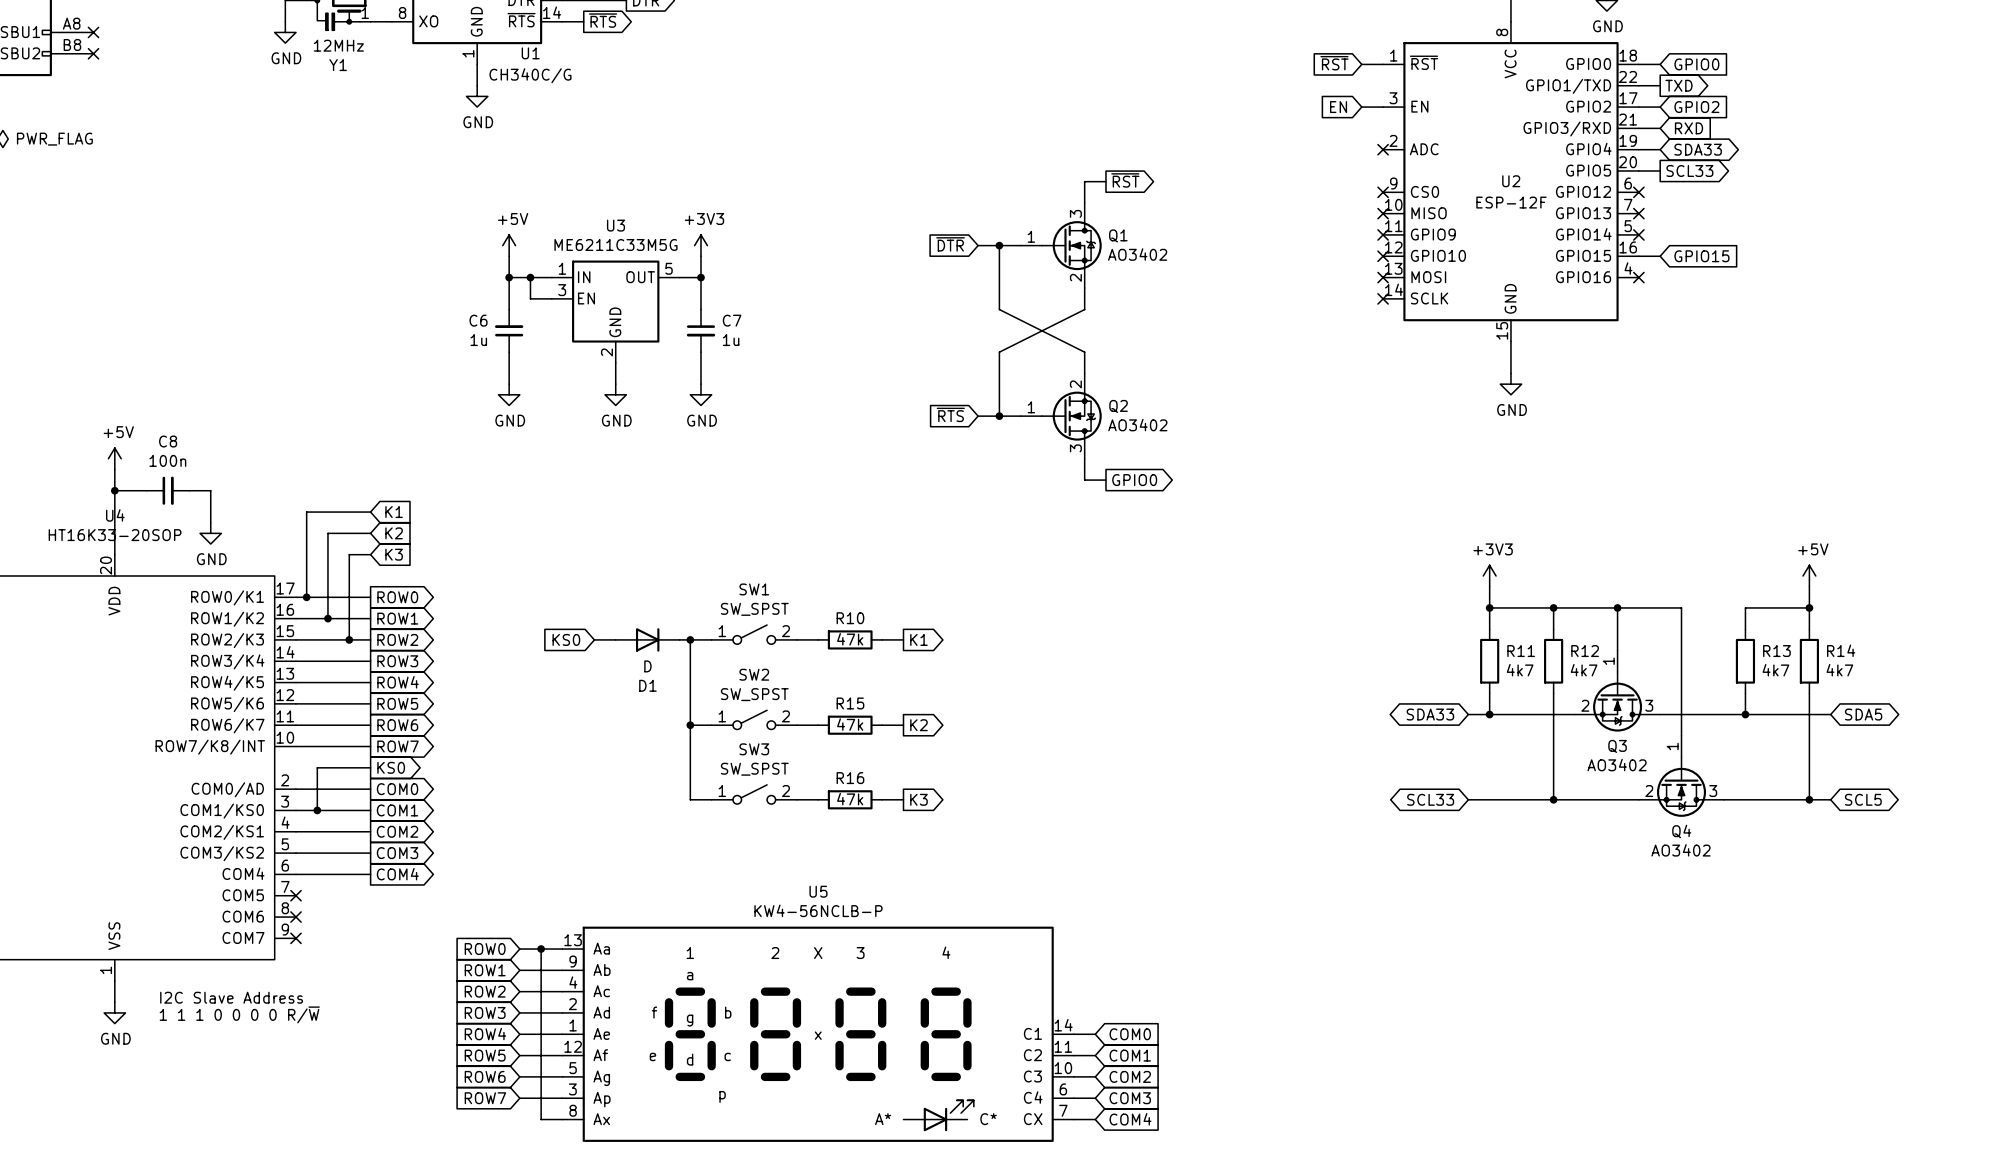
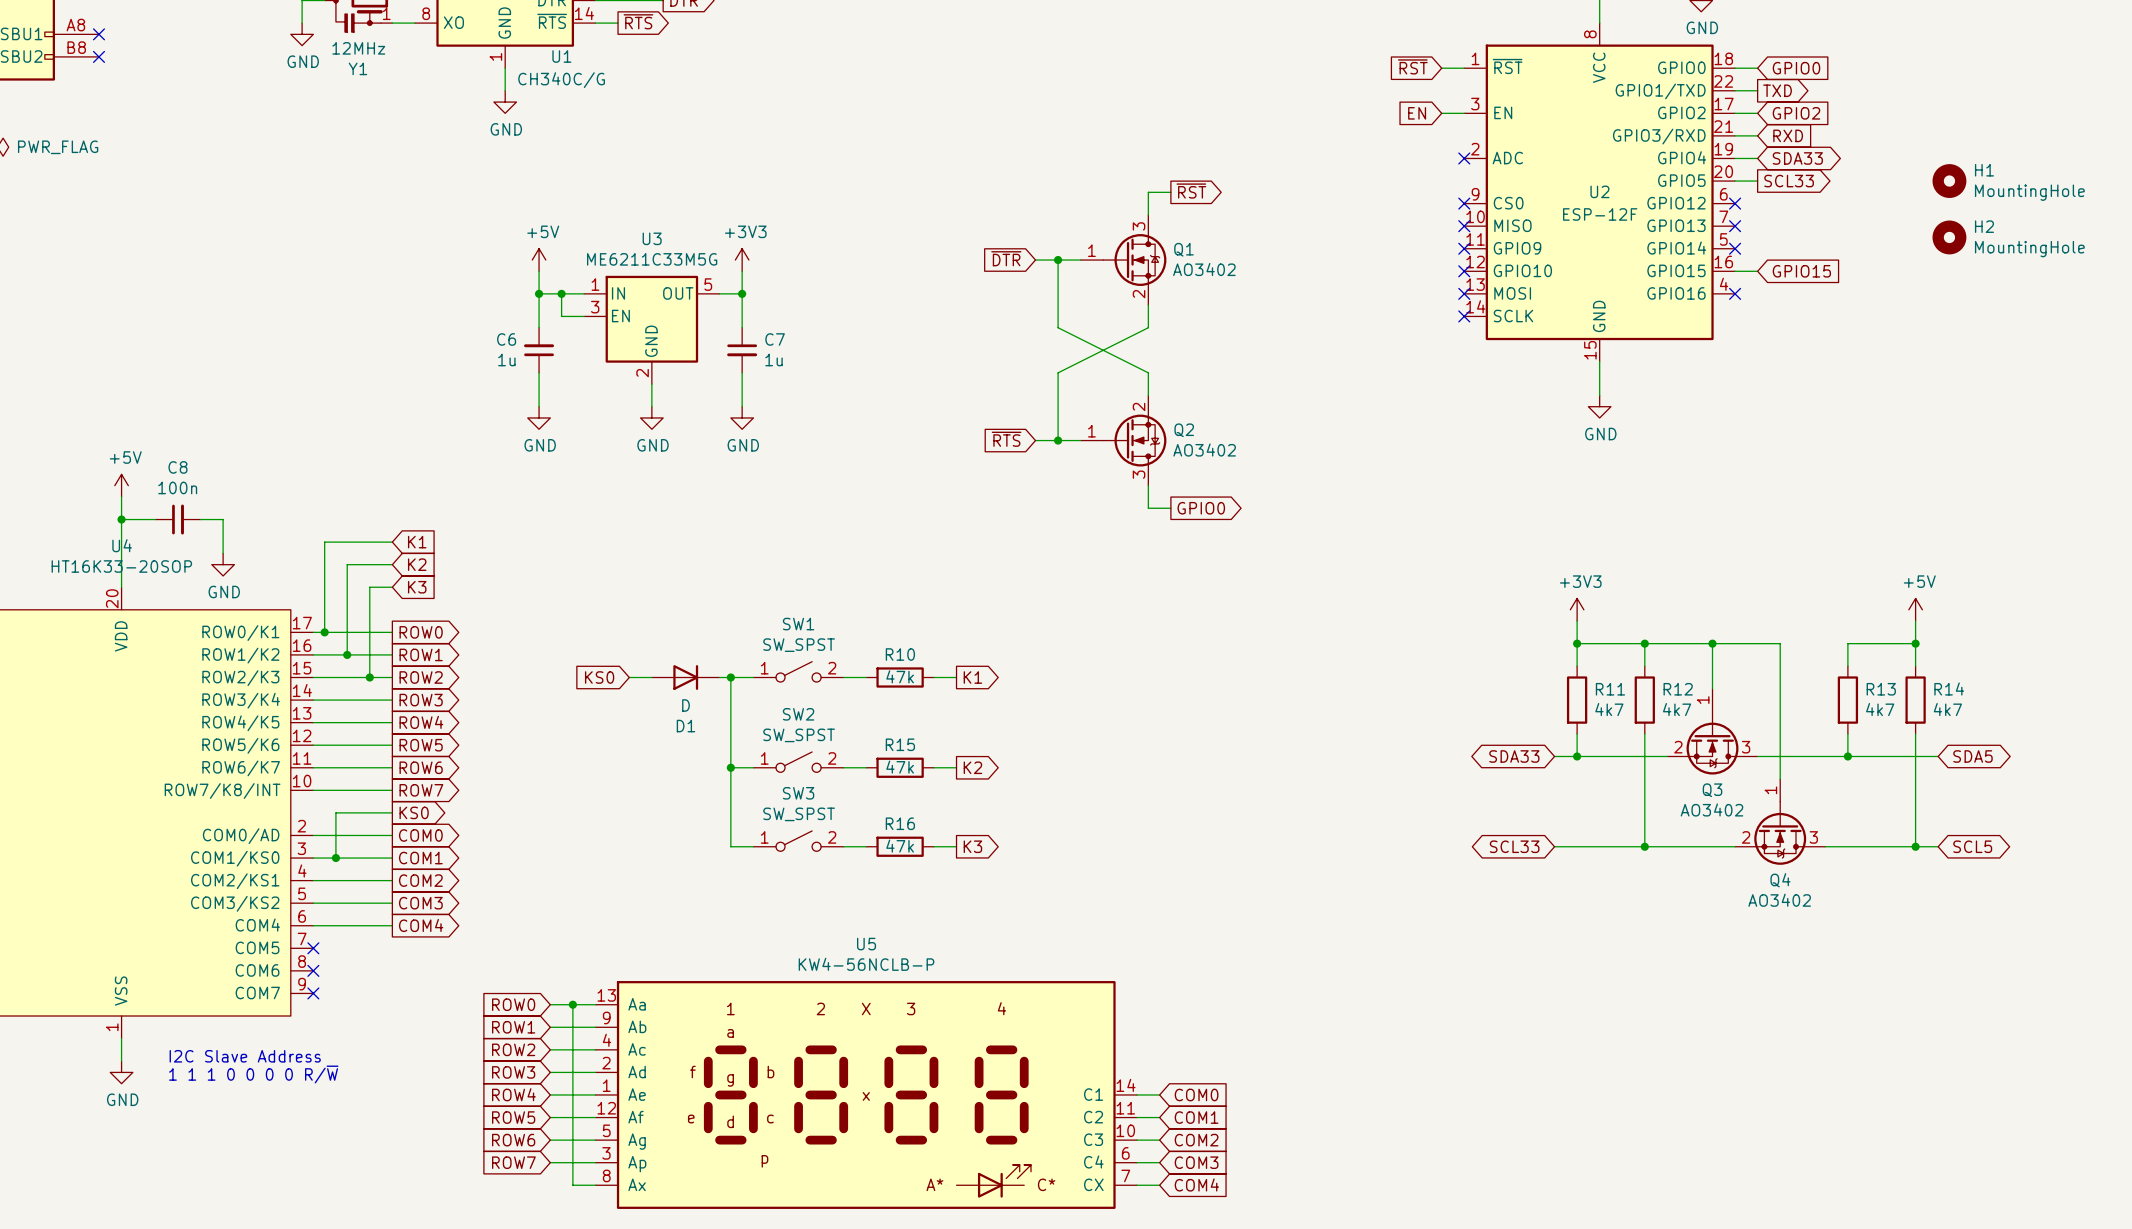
H1: none -> MountingHole (1949, 181)
H2: none -> MountingHole (1949, 237)

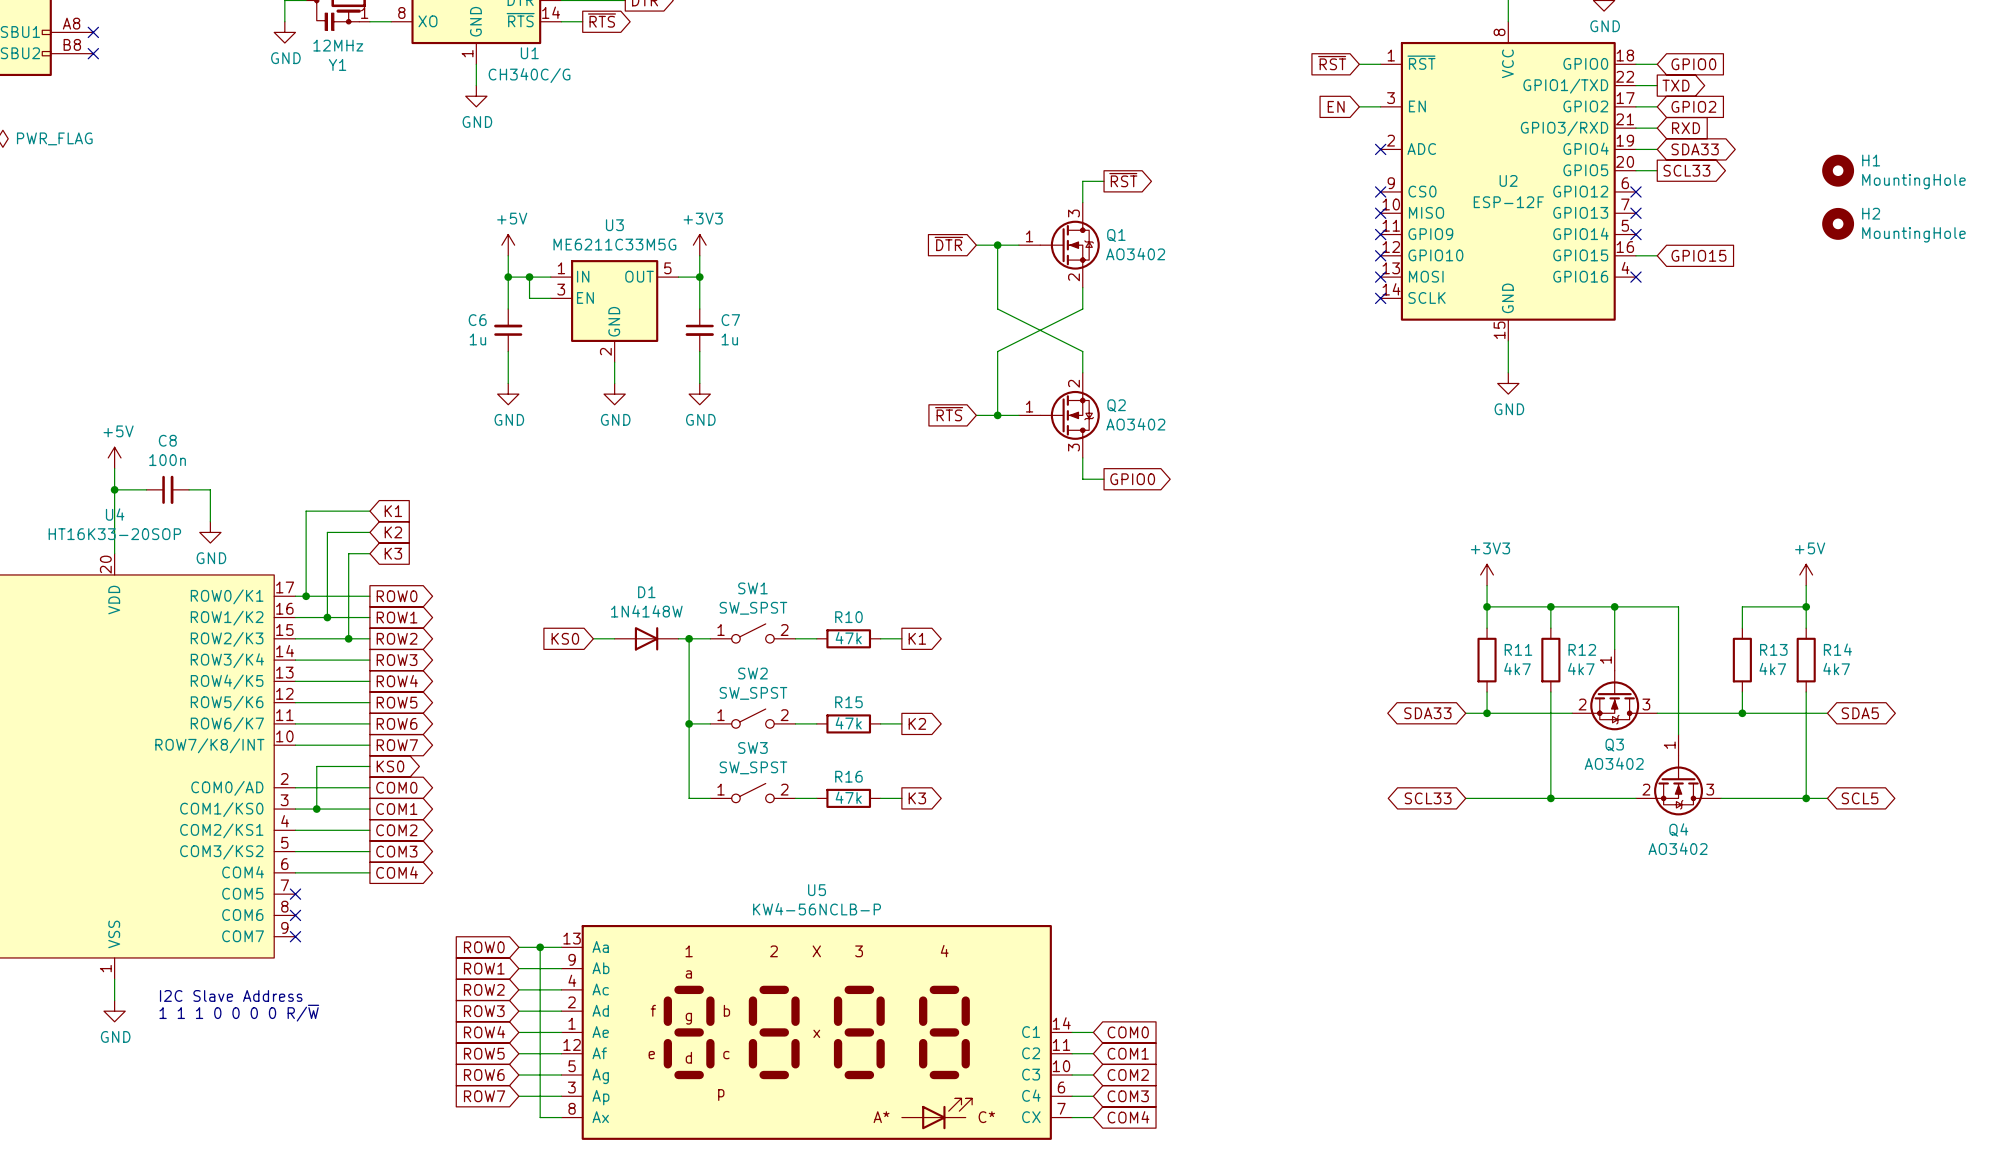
D1 value: D (685, 705) -> 1N4148W (646, 611)
D1 name position: D1 (685, 726) -> D1 (646, 592)

